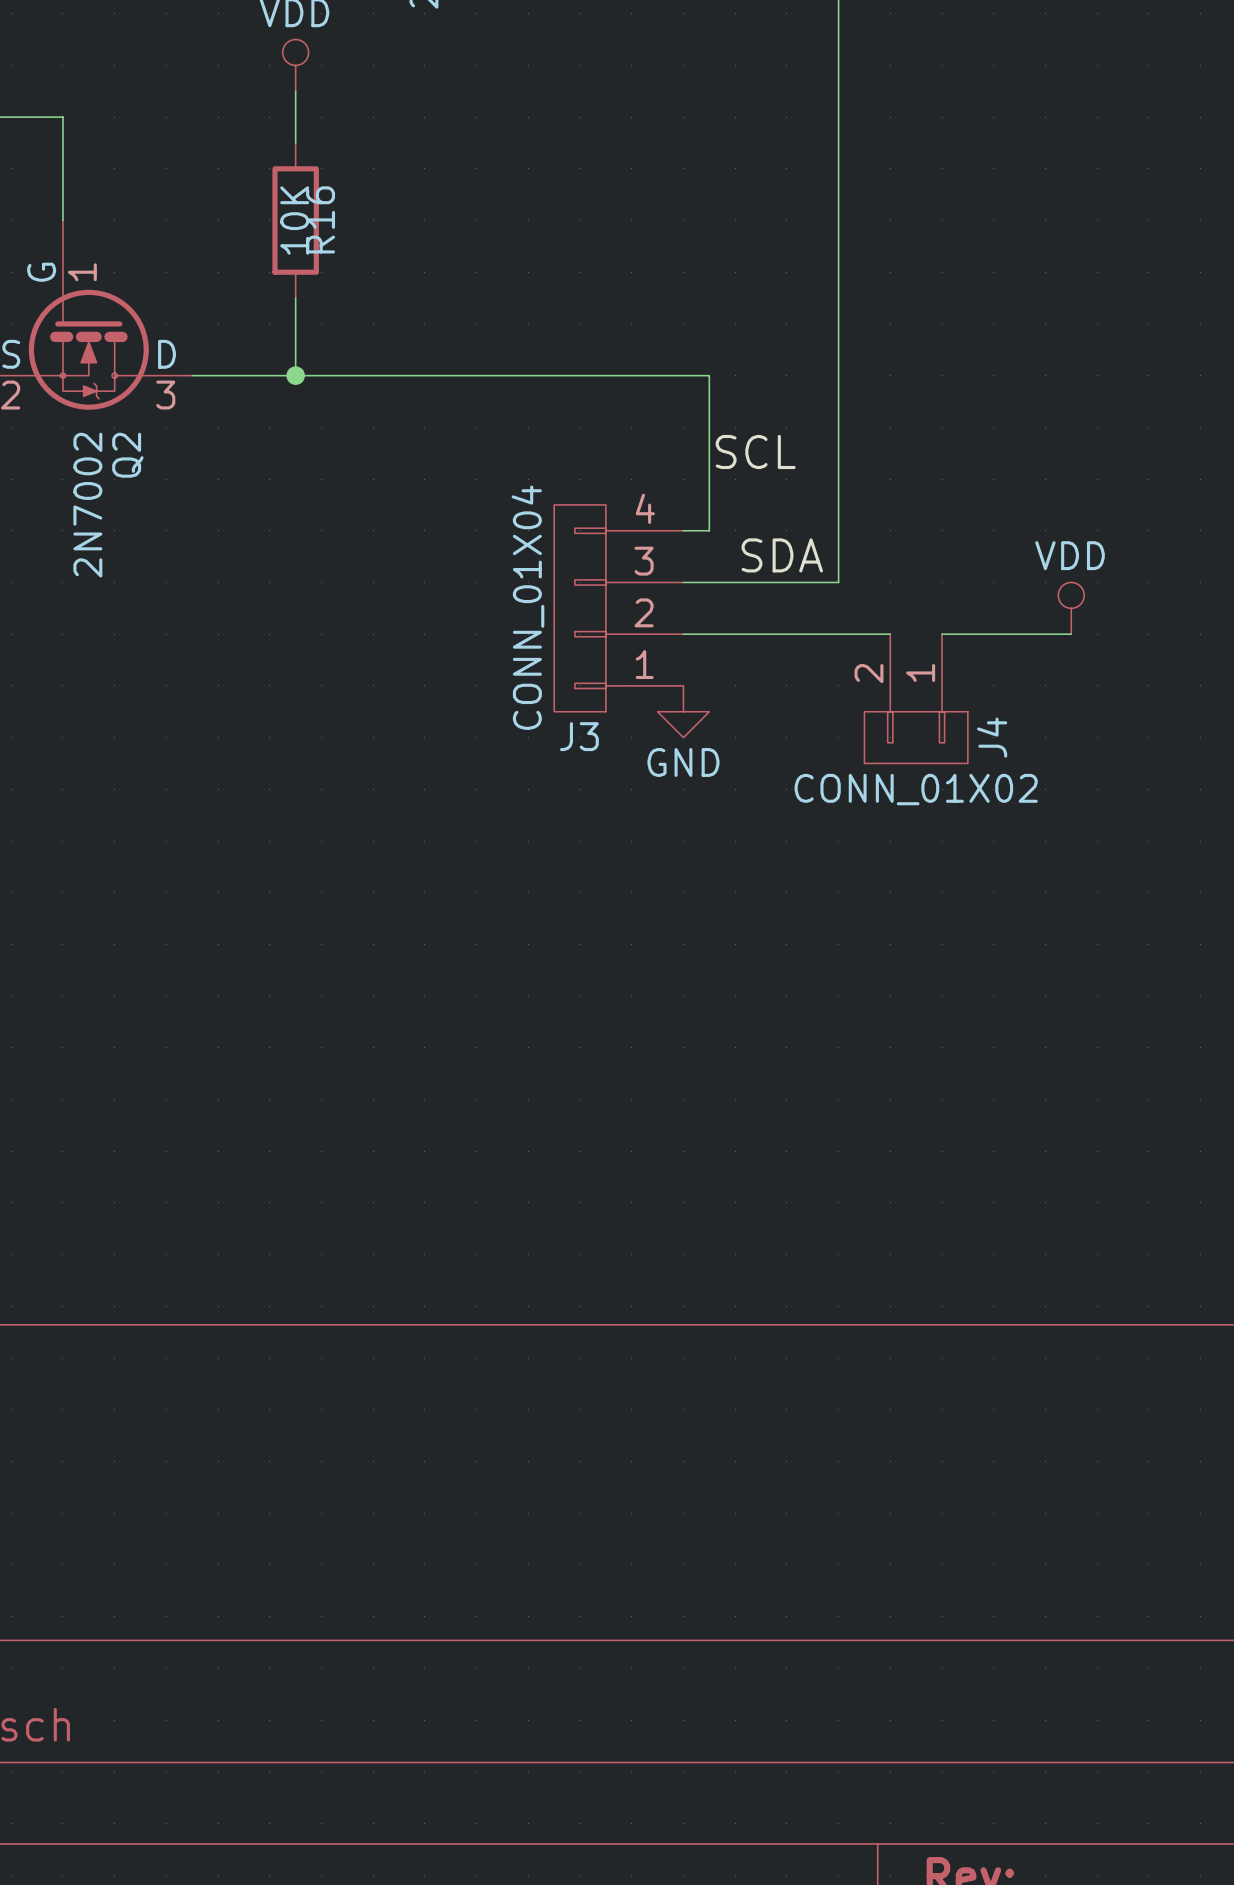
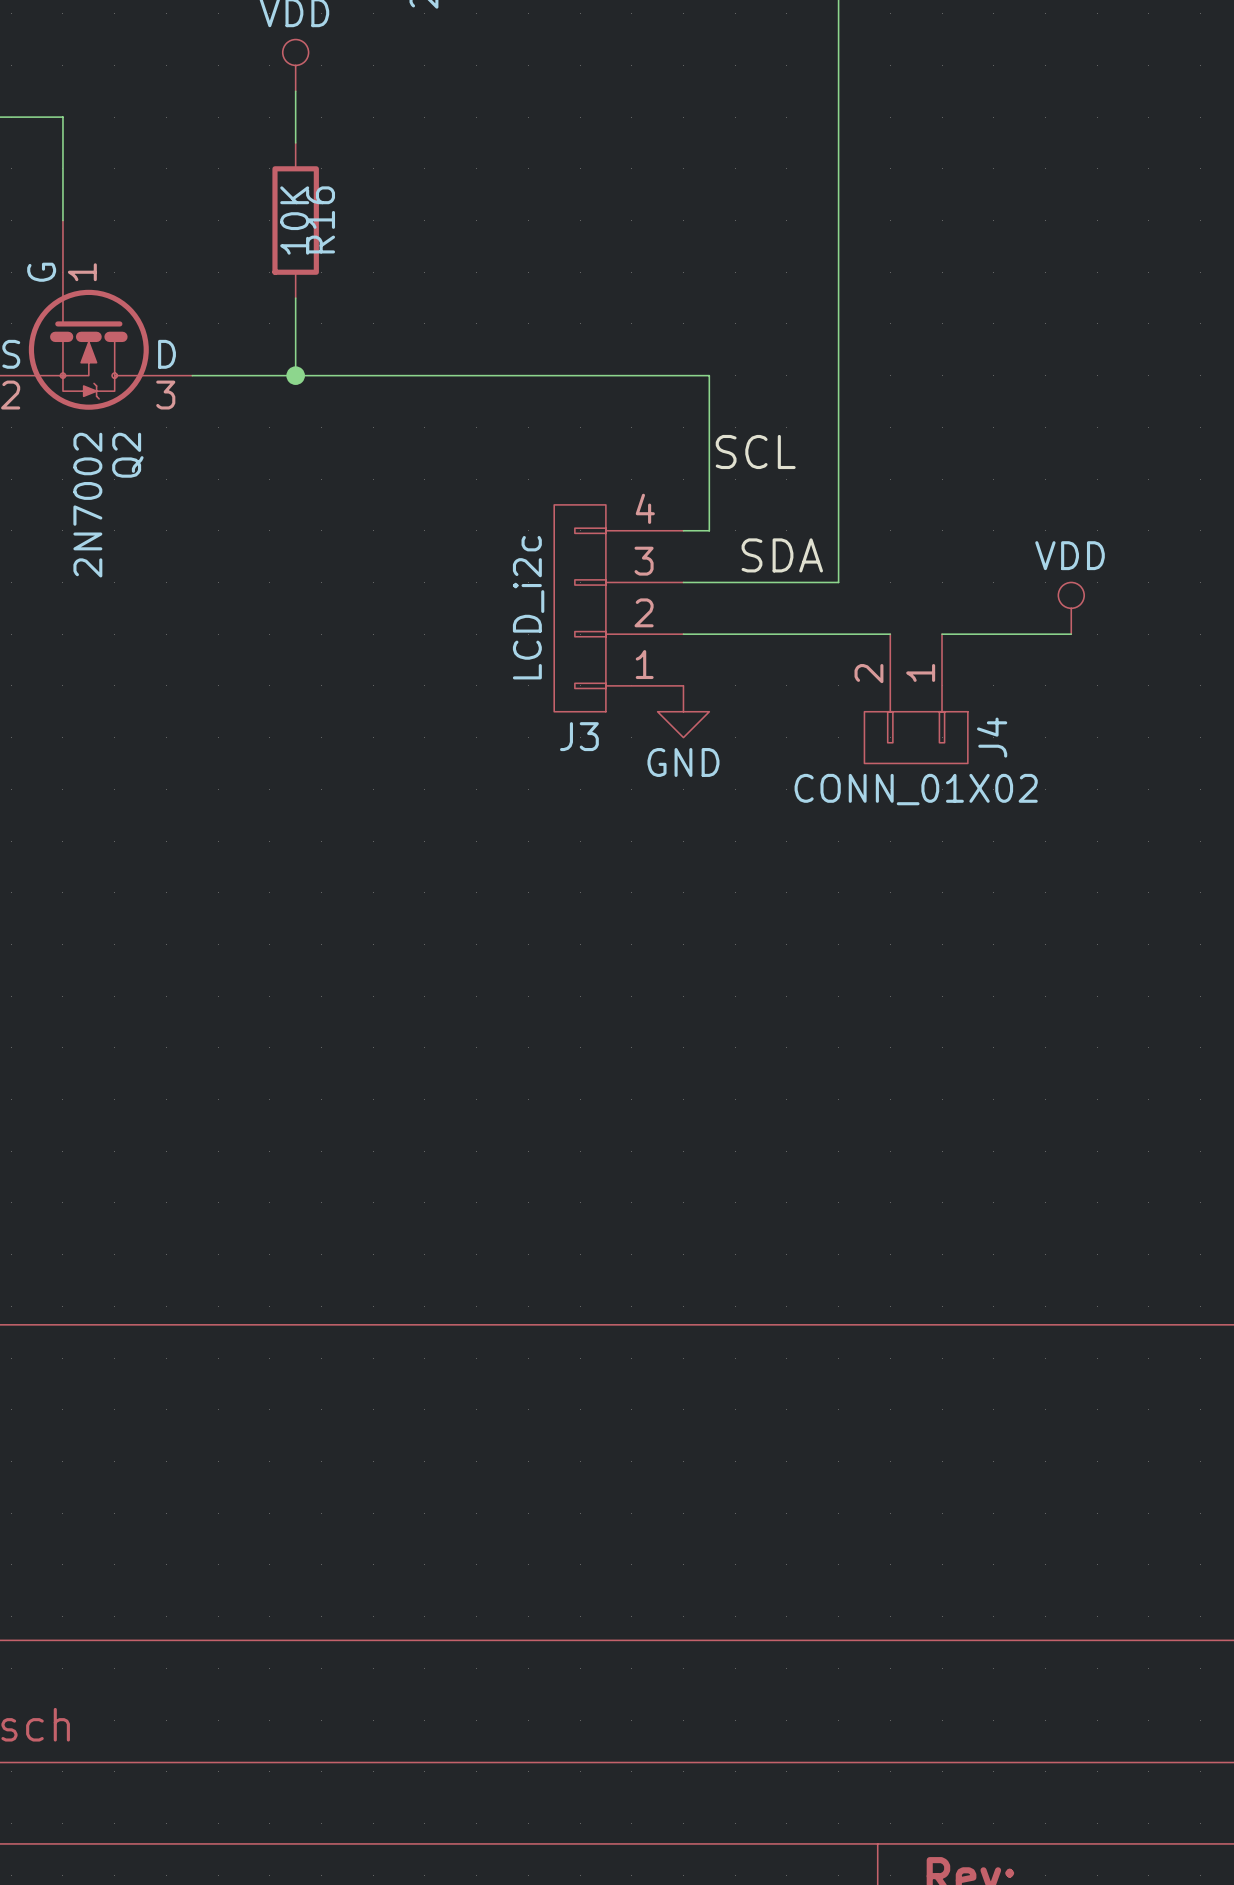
J3 value: CONN_01X04 (527, 607) -> LCD_i2c (528, 607)

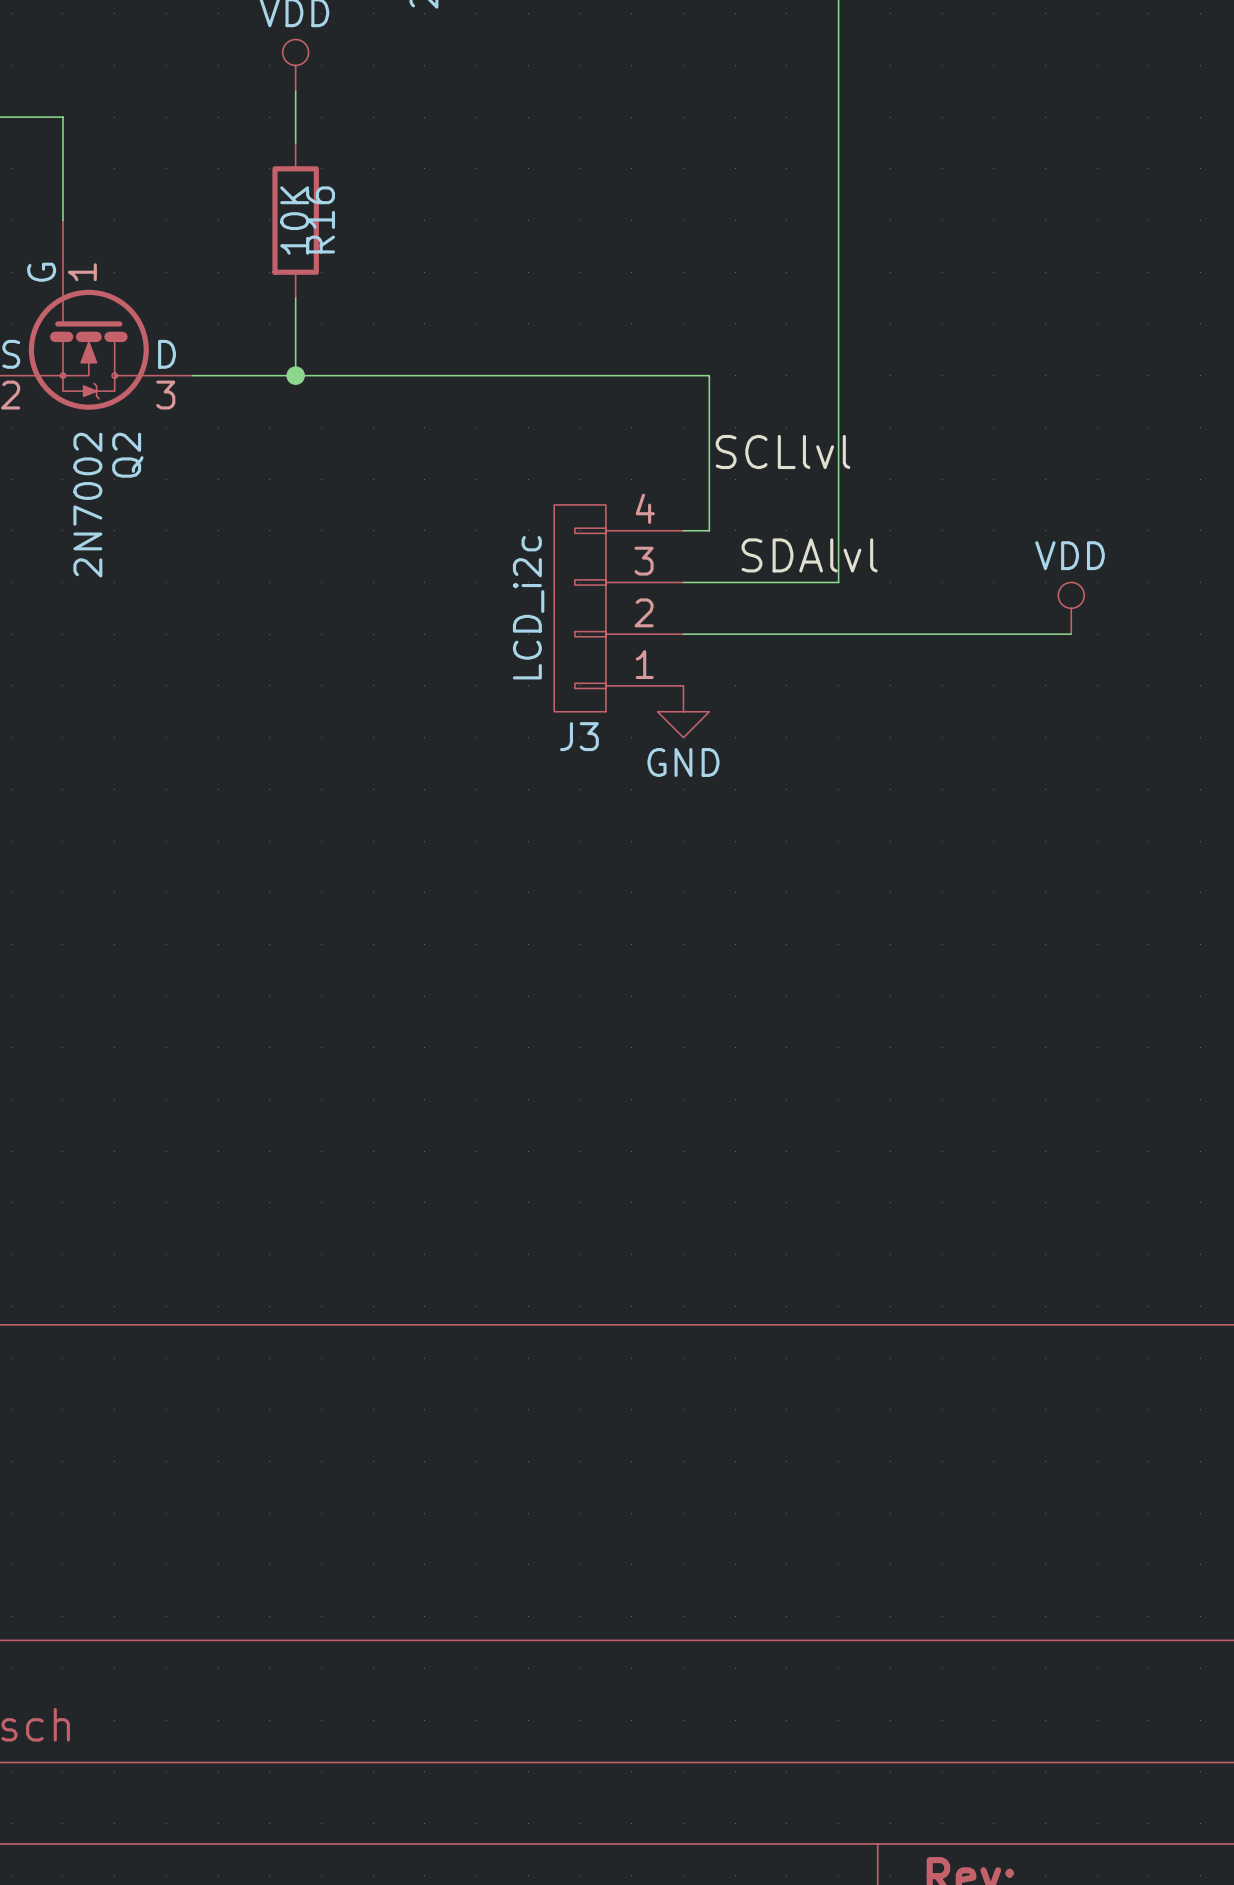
label: SCL (755, 451) -> SCLlvl (783, 451)
label: SDA (782, 555) -> SDAlvl (809, 555)
wire: none -> (890, 634) (942, 634)
J4: CONN_01X02 (916, 698) -> none

